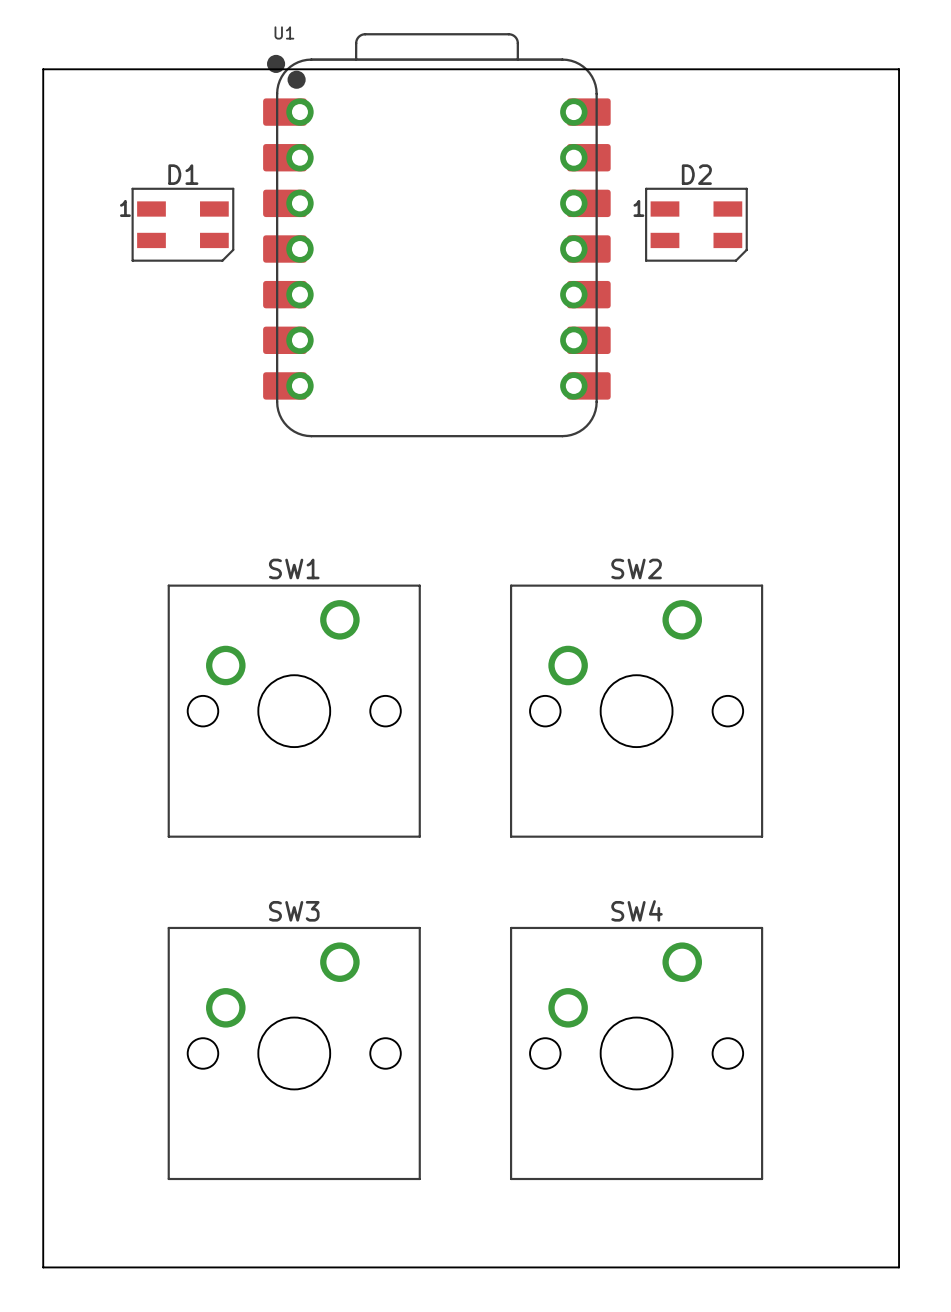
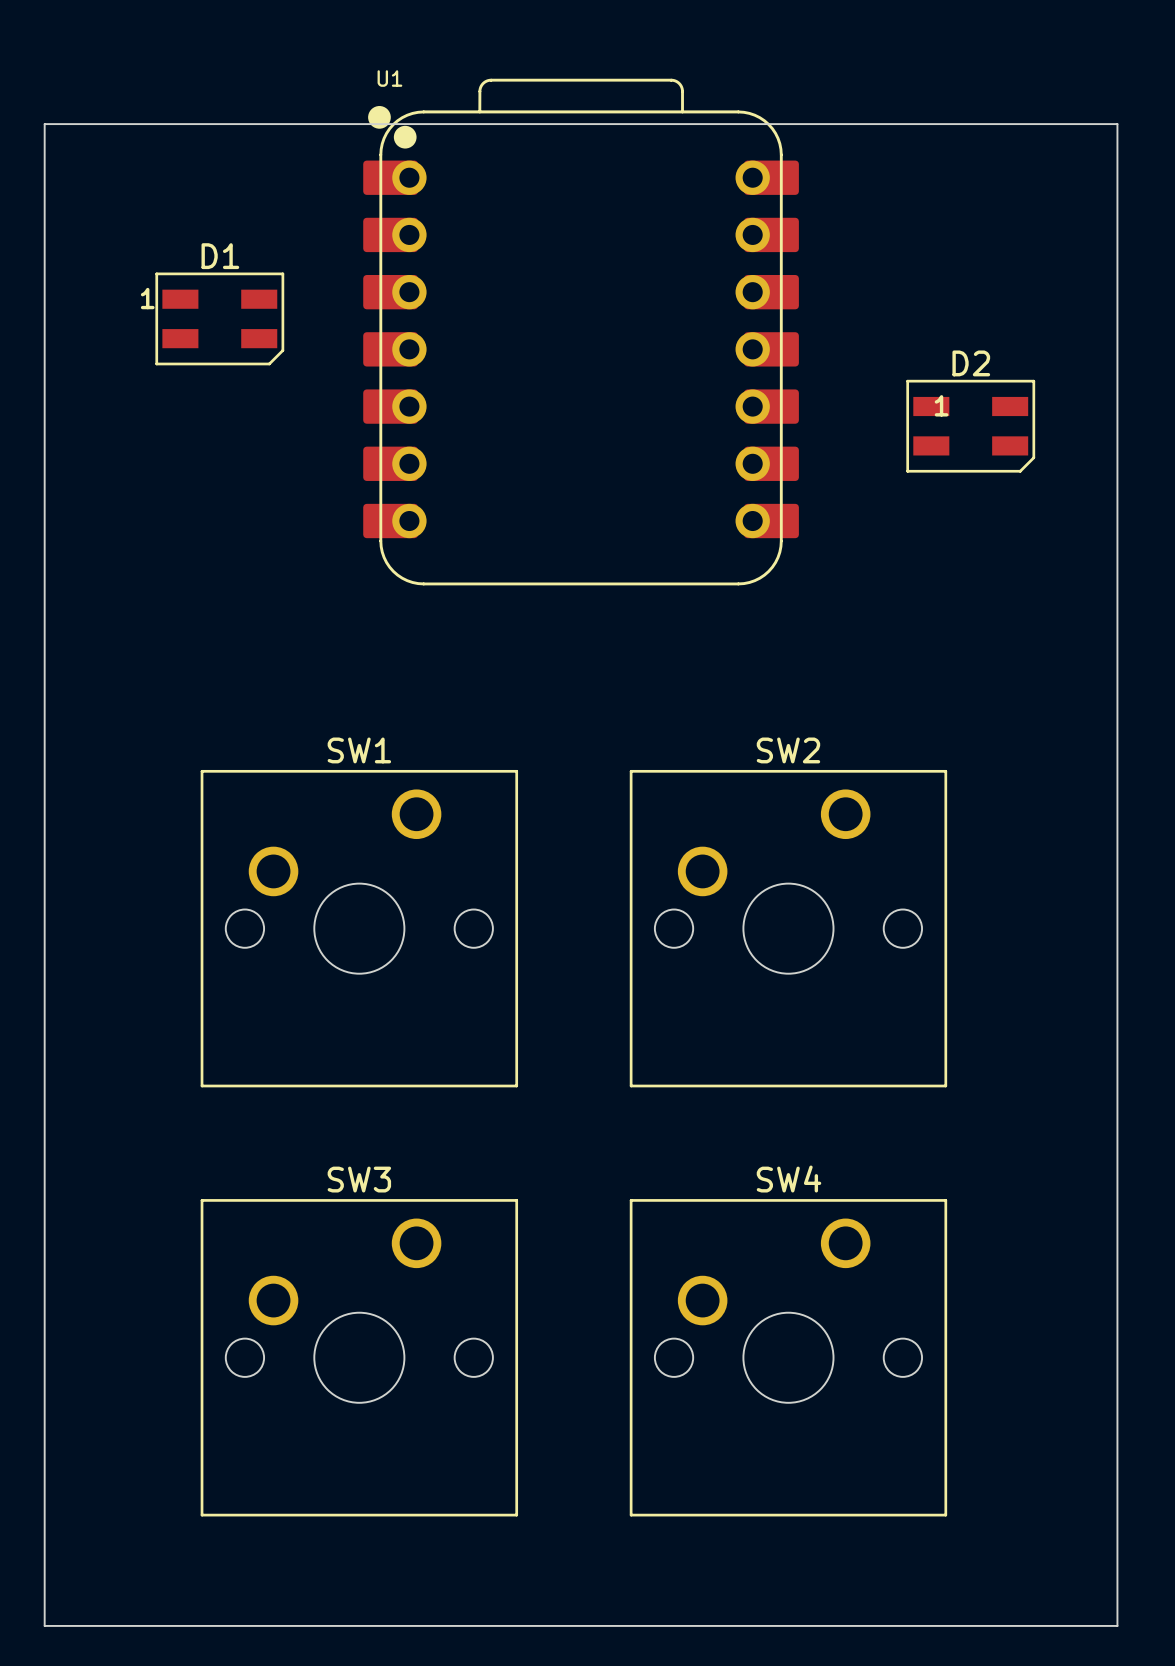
D2 text position: 1 (638, 208) -> 1 (941, 405)
D2 position: (696, 224) -> (970, 426)
U1 position: (436, 235) -> (581, 332)

